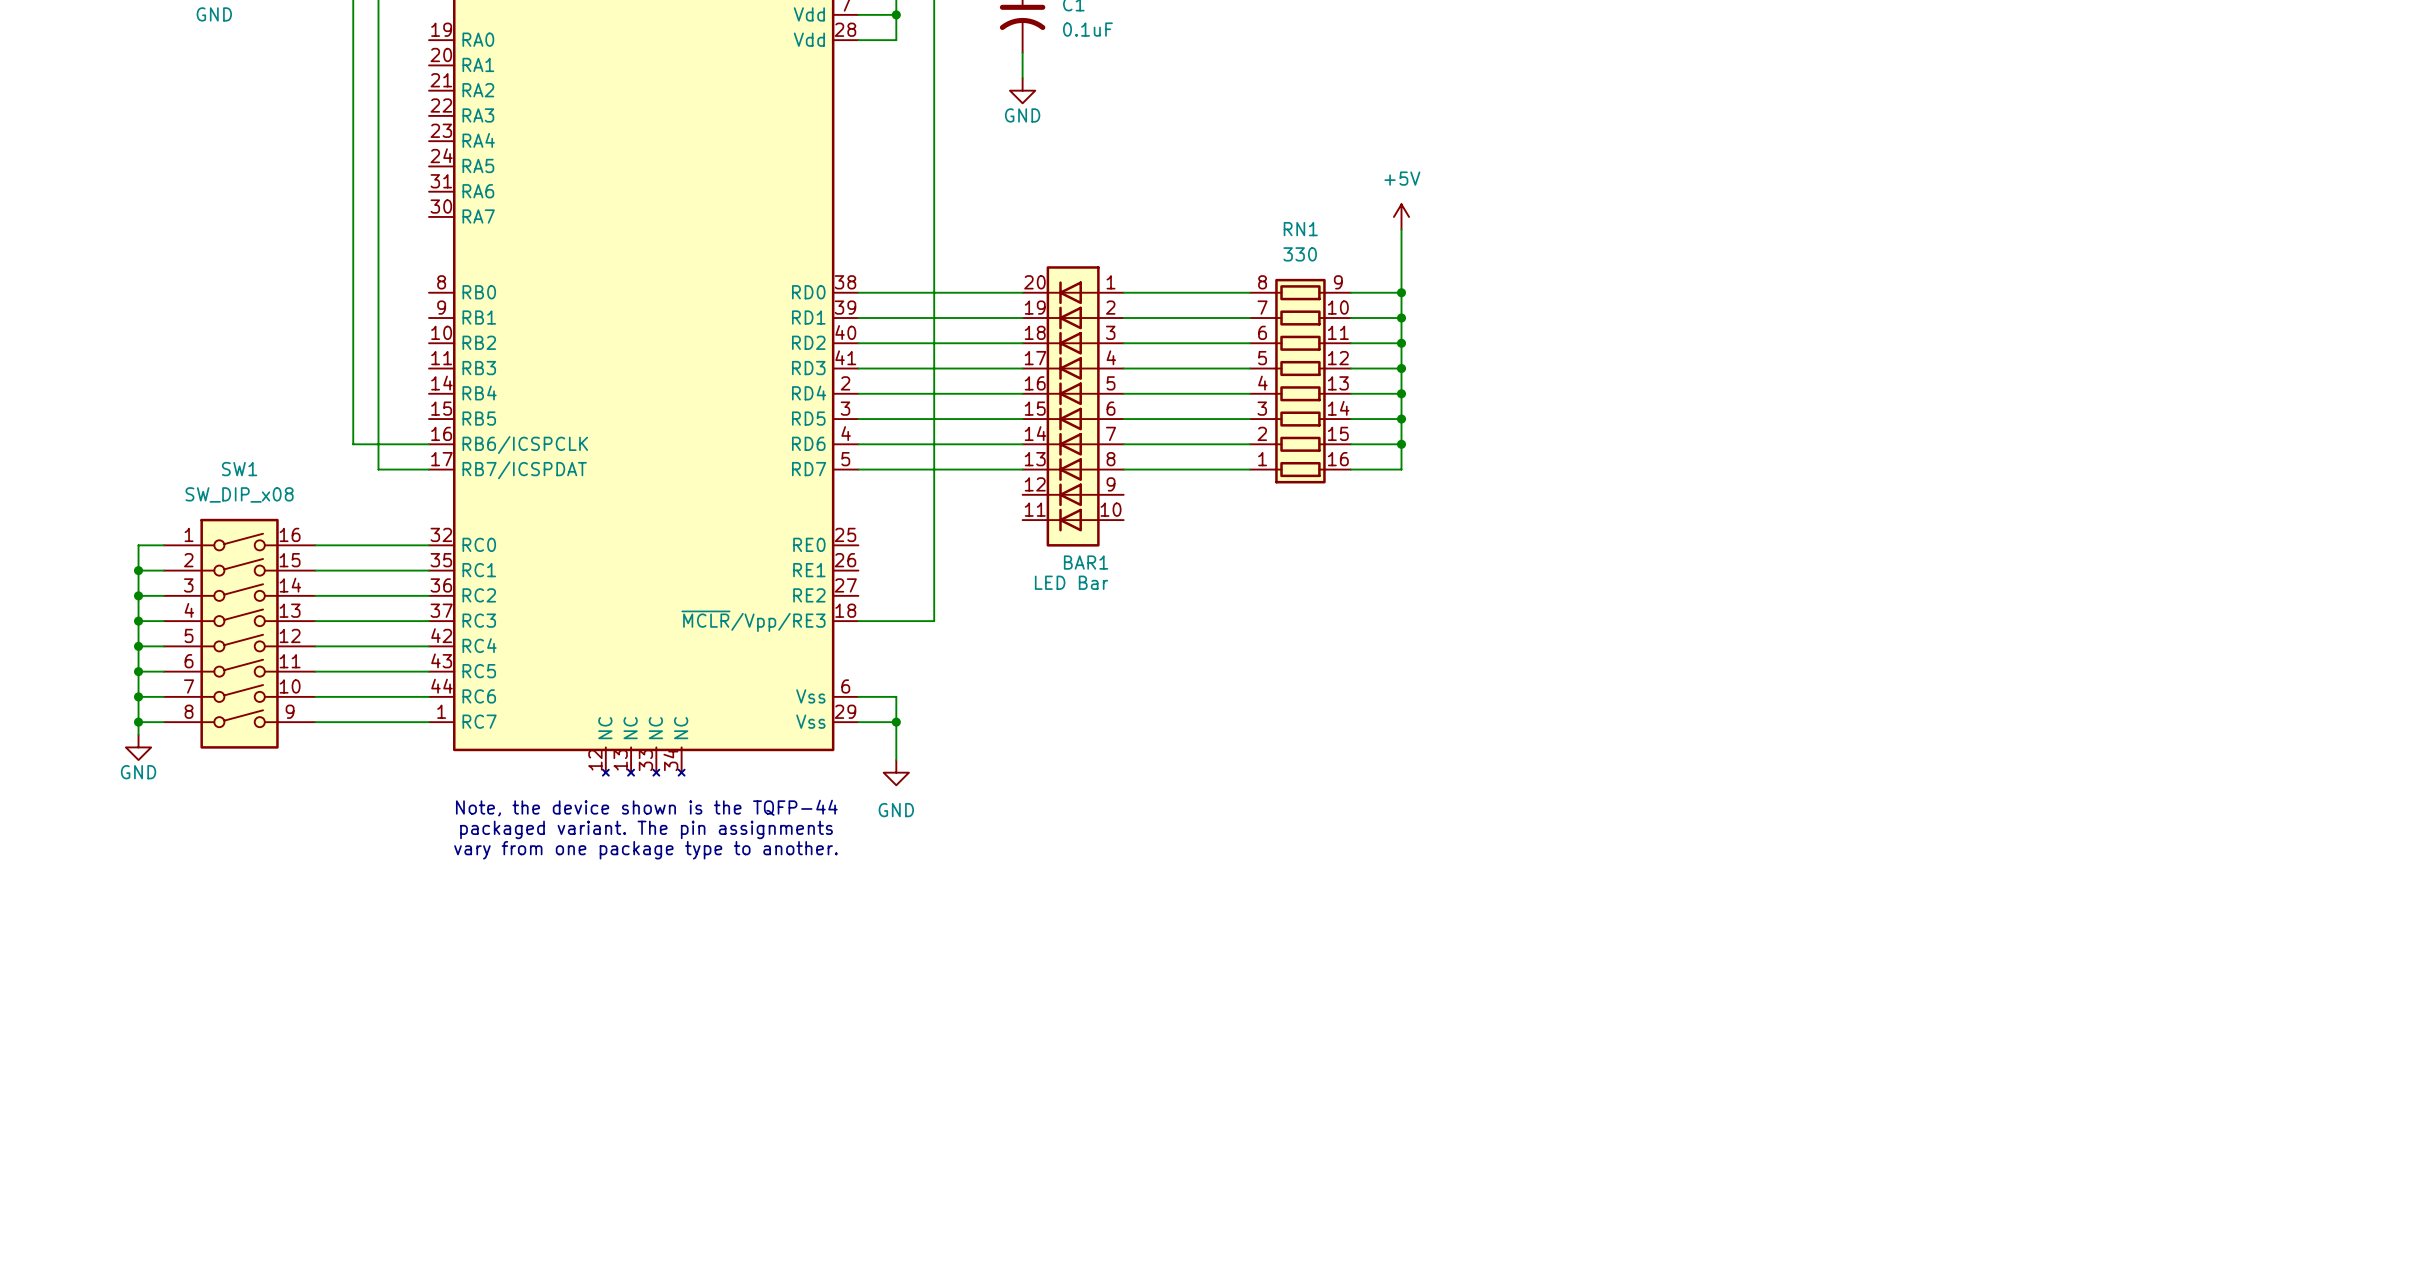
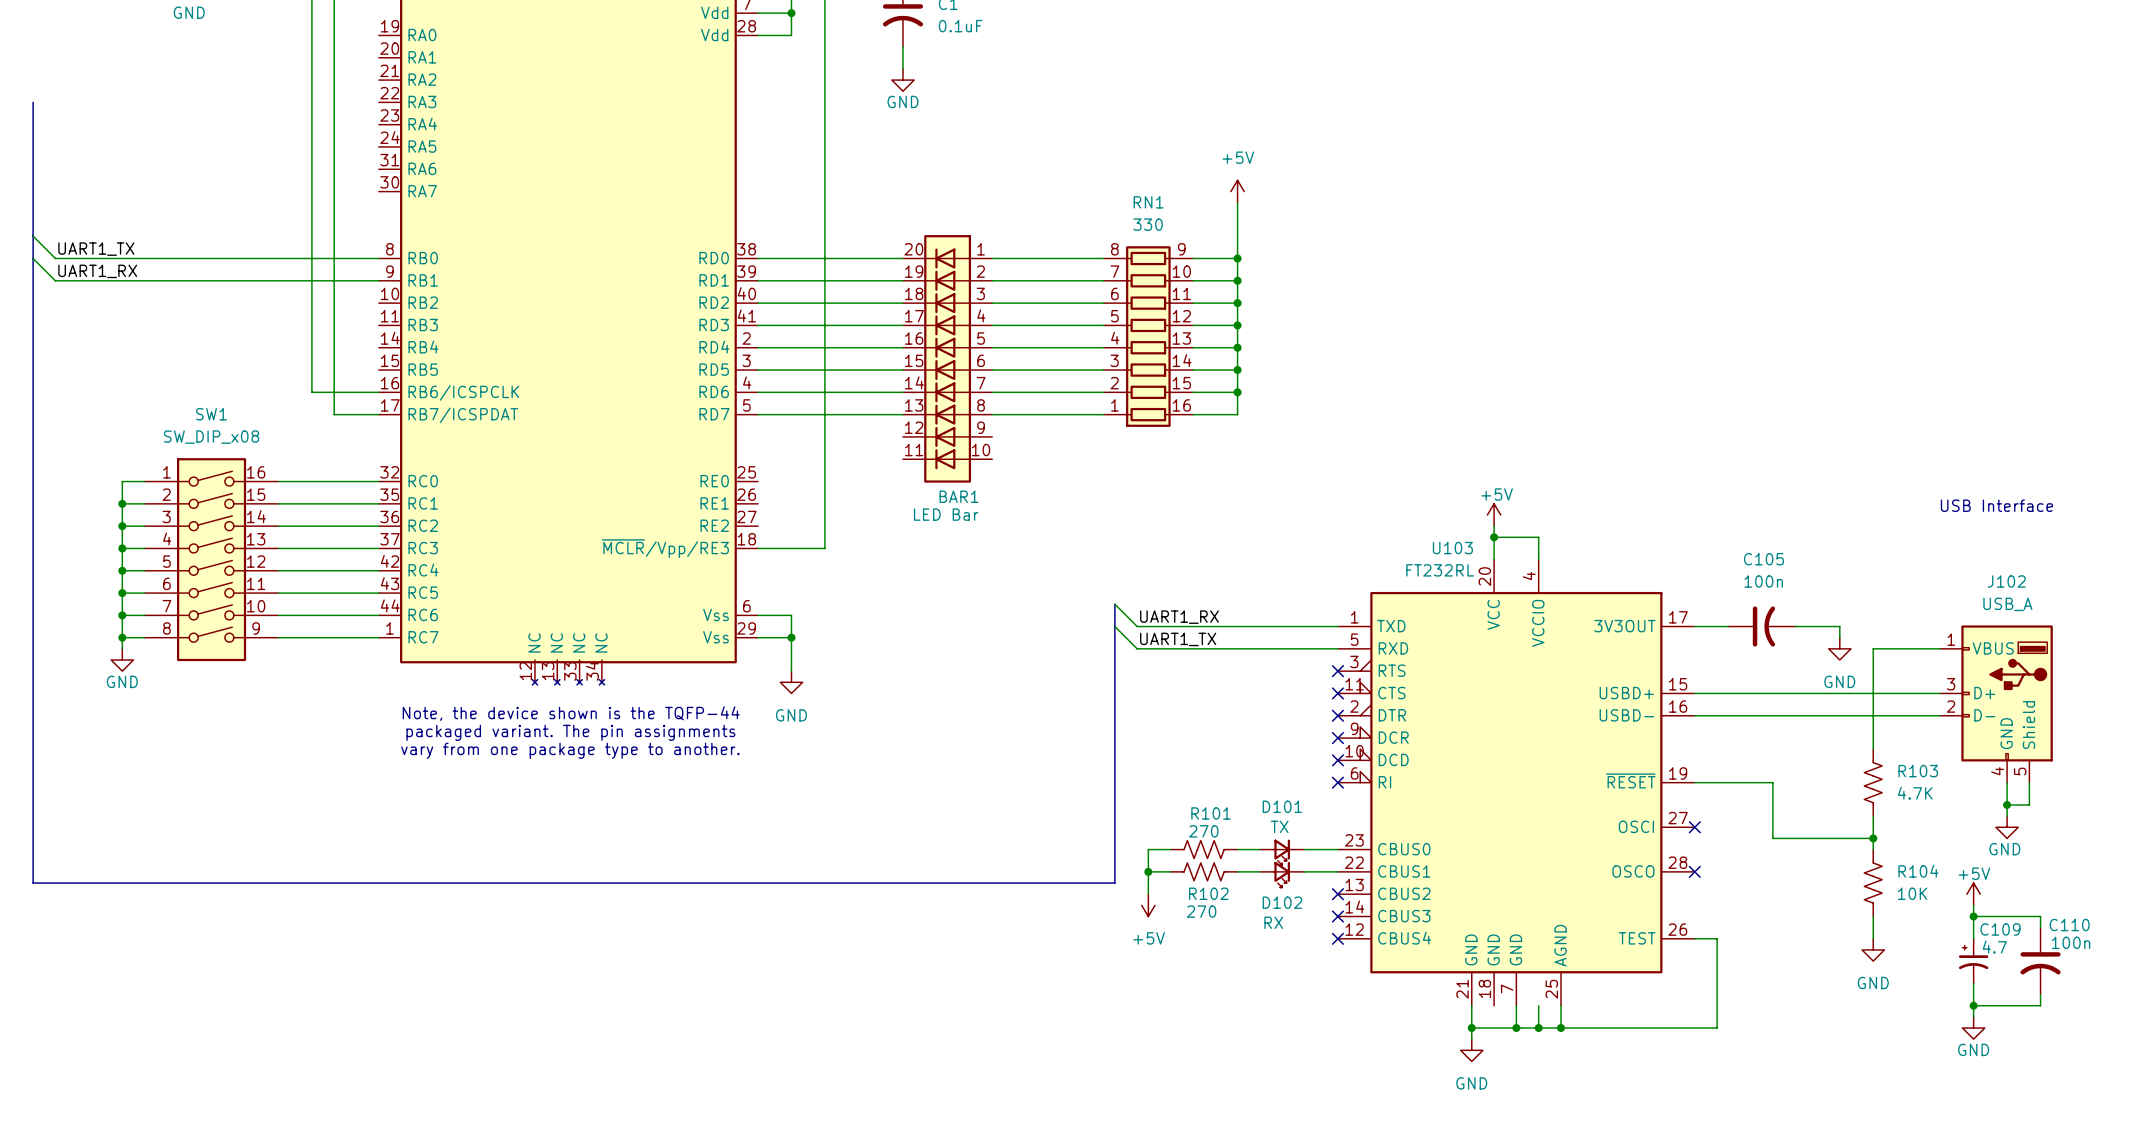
bus: none -> (33, 102) (33, 883) (1114, 883) (1114, 604)
wire: none -> (33, 236) (55, 258) (378, 258)
label: none -> UART1_TX (96, 249)
wire: none -> (33, 258) (55, 280) (378, 280)
label: none -> UART1_RX (97, 271)
text: none -> USB Interface (1996, 505)
power symbol: none -> +5V (1494, 515)
wire: none -> (1494, 526) (1494, 559)
wire: none -> (1494, 537) (1538, 537) (1538, 559)
junction: none -> (1494, 537)
wire: none -> (1114, 604) (1137, 626) (1337, 626)
label: none -> UART1_RX (1179, 617)
wire: none -> (1114, 626) (1137, 648) (1337, 648)
wire: none -> (1694, 626) (1728, 626)
C105: none -> 100n (1761, 626)
wire: none -> (1795, 626) (1839, 626) (1839, 637)
label: none -> UART1_TX (1178, 639)
power symbol: none -> GND (1839, 648)
wire: none -> (1940, 648) (1873, 648) (1873, 749)
no-connect mark: none -> (1337, 671)
no-connect mark: none -> (1337, 693)
wire: none -> (1694, 693) (1940, 693)
J102: none -> USB_A (1996, 704)
no-connect mark: none -> (1337, 715)
wire: none -> (1694, 715) (1940, 715)
no-connect mark: none -> (1337, 738)
no-connect mark: none -> (1337, 760)
no-connect mark: none -> (1337, 782)
U103: none -> FT232RL (1516, 782)
wire: none -> (1694, 782) (1772, 782) (1772, 838) (1873, 838)
R103: none -> 4.7K (1873, 782)
wire: none -> (2007, 782) (2007, 816)
wire: none -> (2029, 782) (2029, 804) (2007, 804)
junction: none -> (2007, 804)
wire: none -> (1873, 816) (1873, 849)
no-connect mark: none -> (1694, 827)
power symbol: none -> GND (2007, 827)
junction: none -> (1873, 838)
wire: none -> (1170, 849) (1148, 849) (1148, 894)
R101: none -> 270 (1204, 849)
wire: none -> (1237, 849) (1259, 849)
wire: none -> (1304, 849) (1337, 849)
D101: none -> TX (1282, 852)
wire: none -> (1148, 871) (1170, 871)
junction: none -> (1148, 871)
R102: none -> 270 (1204, 871)
wire: none -> (1237, 871) (1259, 871)
wire: none -> (1304, 871) (1337, 871)
no-connect mark: none -> (1694, 871)
D102: none -> RX (1282, 874)
R104: none -> 10K (1873, 883)
no-connect mark: none -> (1337, 894)
power symbol: none -> +5V (1973, 894)
power symbol: none -> +5V (1148, 905)
wire: none -> (1973, 905) (1973, 938)
no-connect mark: none -> (1337, 916)
wire: none -> (1873, 916) (1873, 938)
wire: none -> (1973, 916) (2040, 916) (2040, 927)
junction: none -> (1973, 916)
no-connect mark: none -> (1337, 938)
wire: none -> (1694, 938) (1717, 938) (1717, 1028) (1471, 1028)
power symbol: none -> GND (1873, 949)
C109: none -> 4.7 (1973, 961)
C110: none -> 100n (2040, 961)
wire: none -> (1973, 983) (1973, 1016)
wire: none -> (2040, 994) (2040, 1005) (1973, 1005)
wire: none -> (1471, 1005) (1471, 1039)
wire: none -> (1516, 1005) (1516, 1028)
wire: none -> (1538, 1005) (1538, 1028)
wire: none -> (1560, 1005) (1560, 1028)
junction: none -> (1973, 1005)
junction: none -> (1471, 1028)
junction: none -> (1516, 1028)
junction: none -> (1538, 1028)
junction: none -> (1560, 1028)
power symbol: none -> GND (1973, 1028)
power symbol: none -> GND (1471, 1050)

